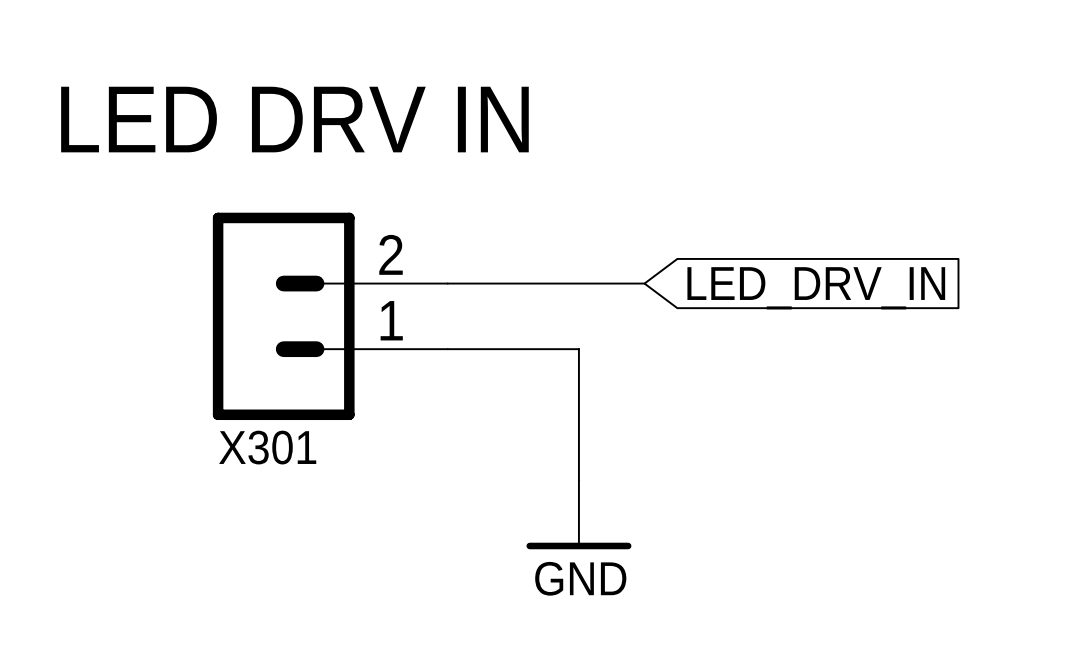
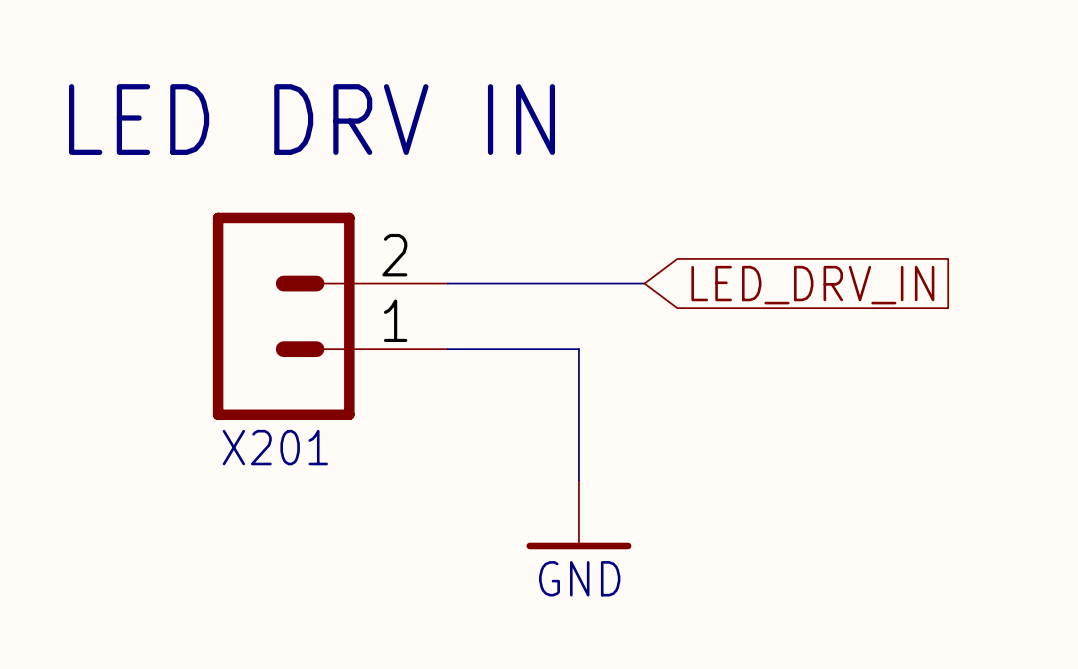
X301 name: X301 (267, 447) -> X201 (275, 447)

